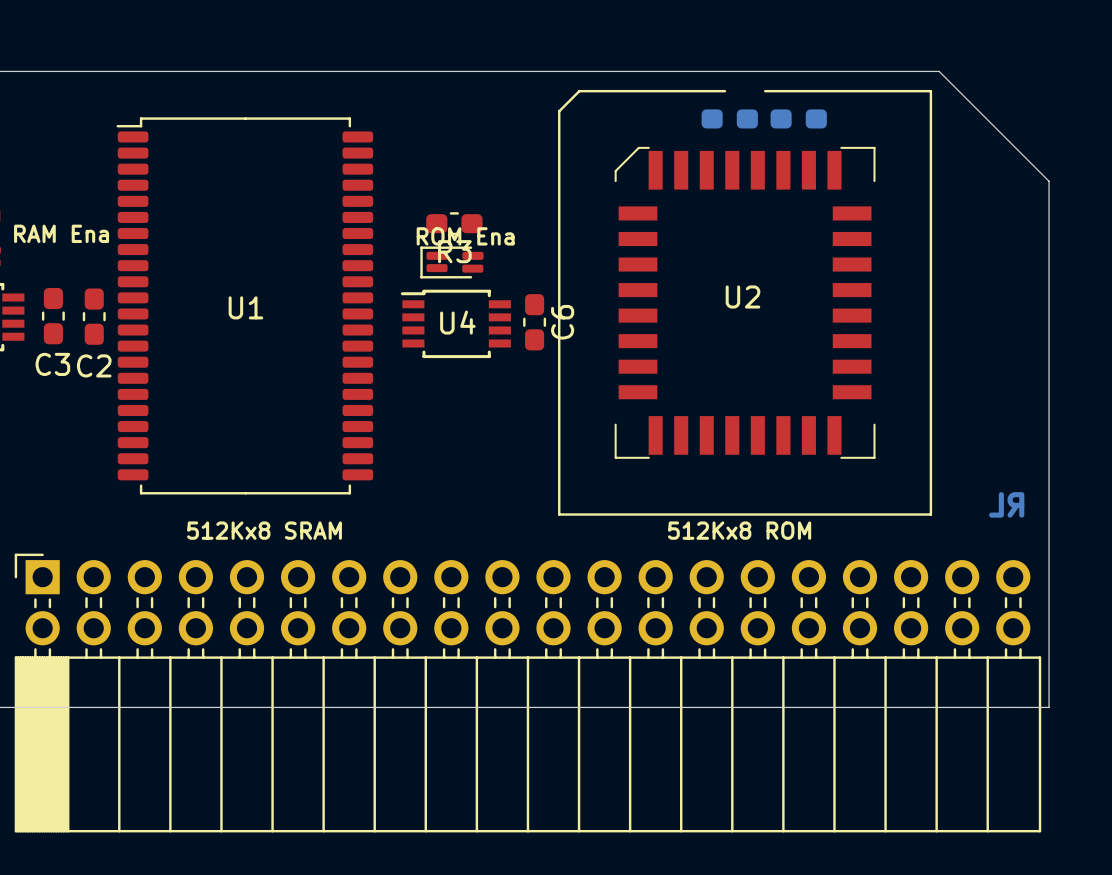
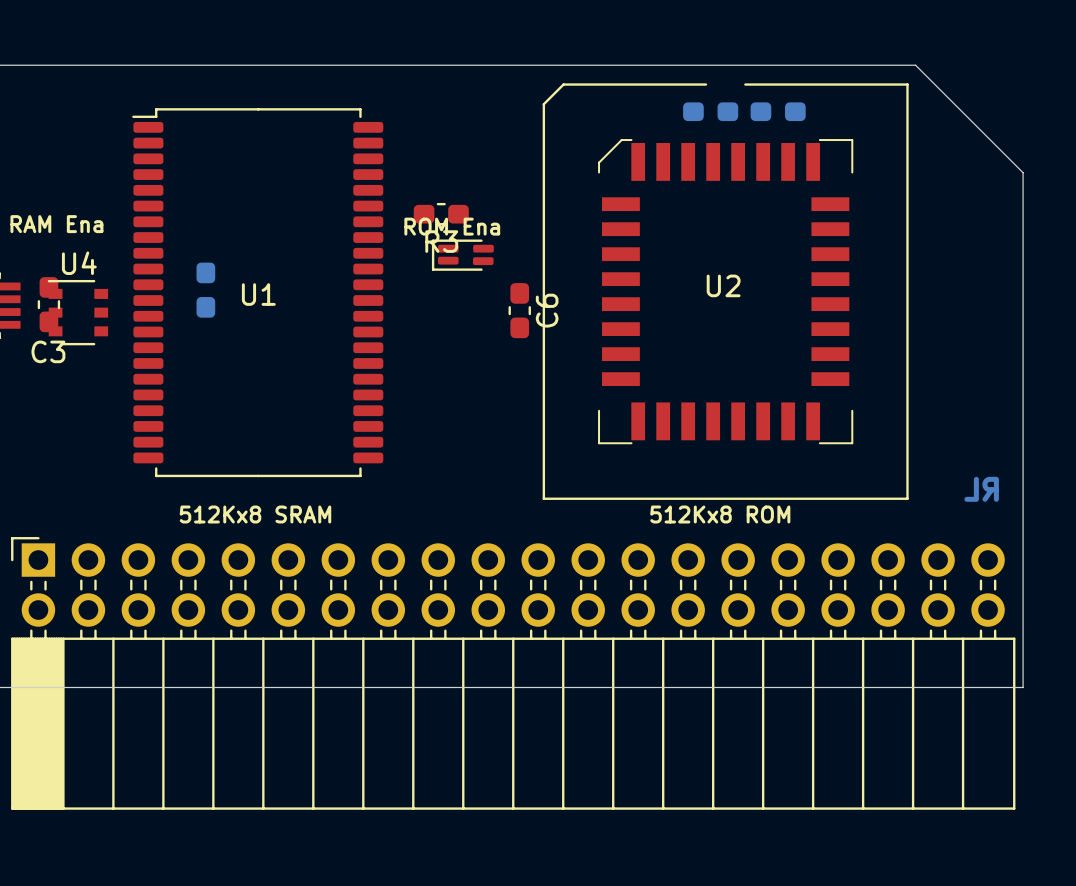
part position: (451, 262) -> (462, 255)
U4 footprint: [400, 289, 511, 359] -> [47, 279, 109, 346]
U1 position: (244, 305) -> (257, 292)
C2 side: top (94, 316) -> bottom (205, 290)
U4 name position: U4 (457, 322) -> U4 (79, 263)

